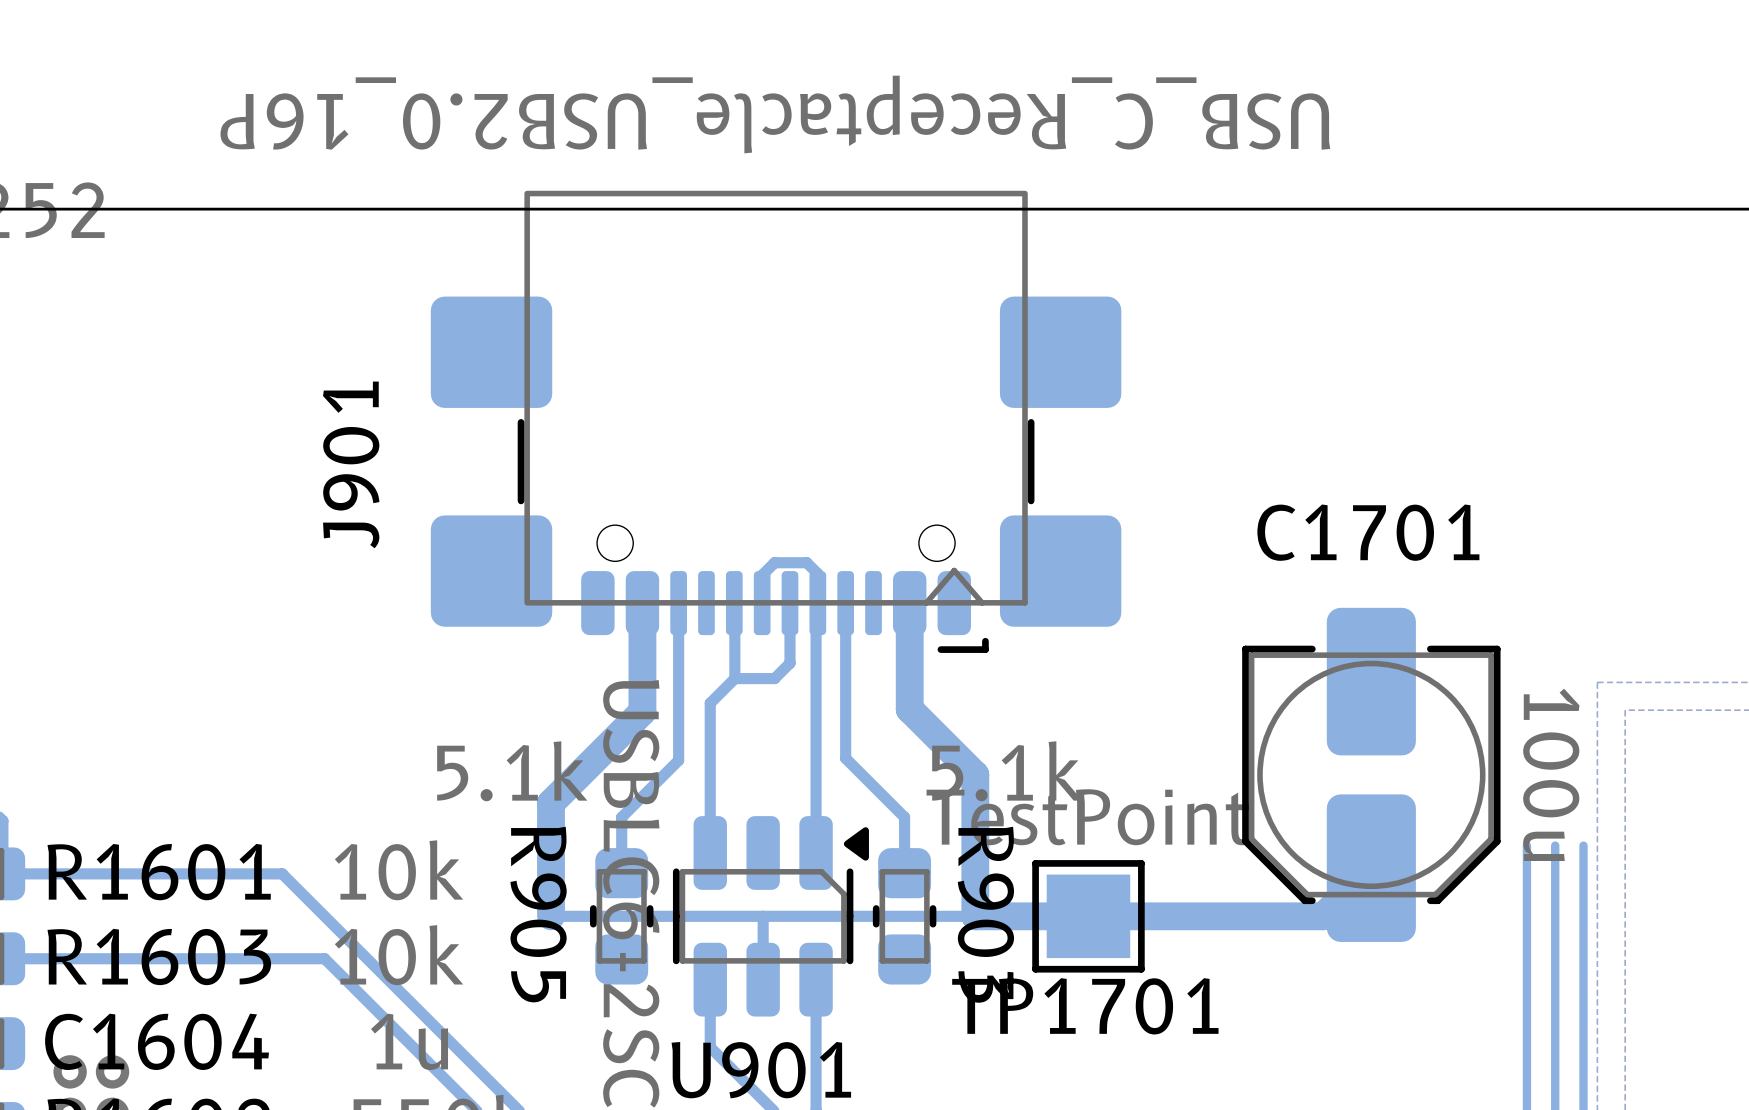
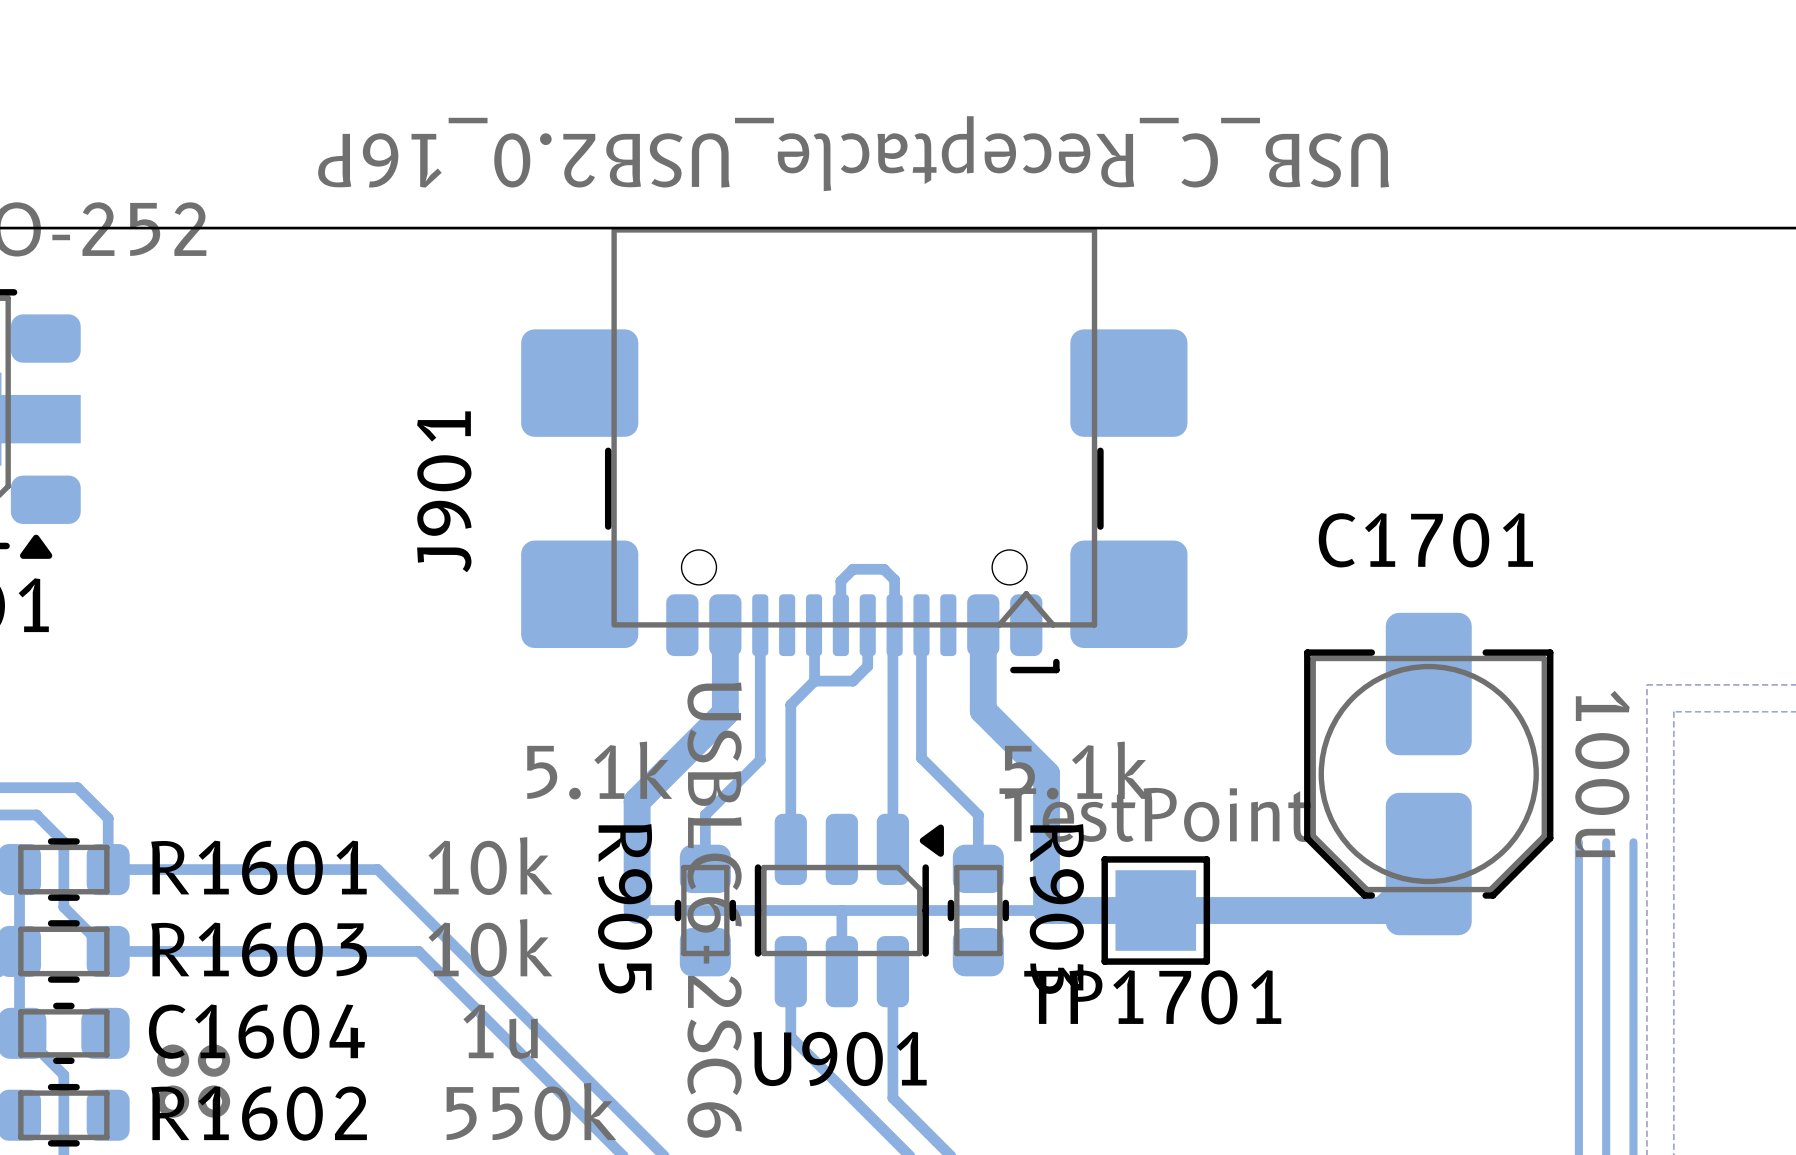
J901 position: (776, 421) -> (854, 450)

